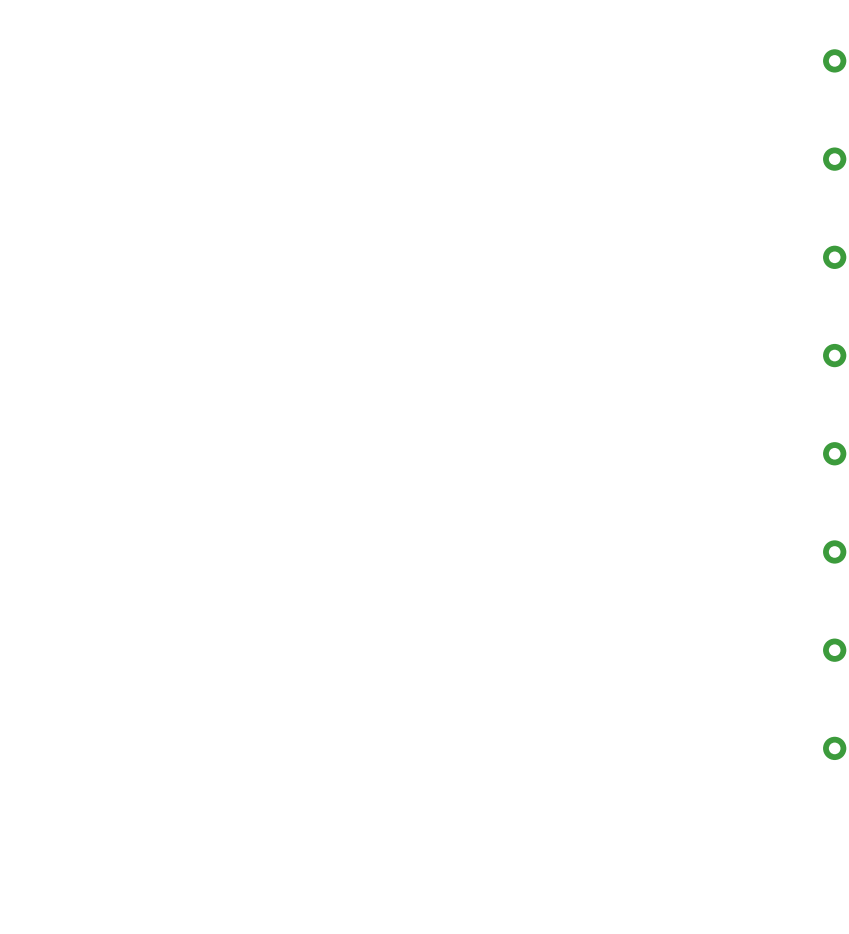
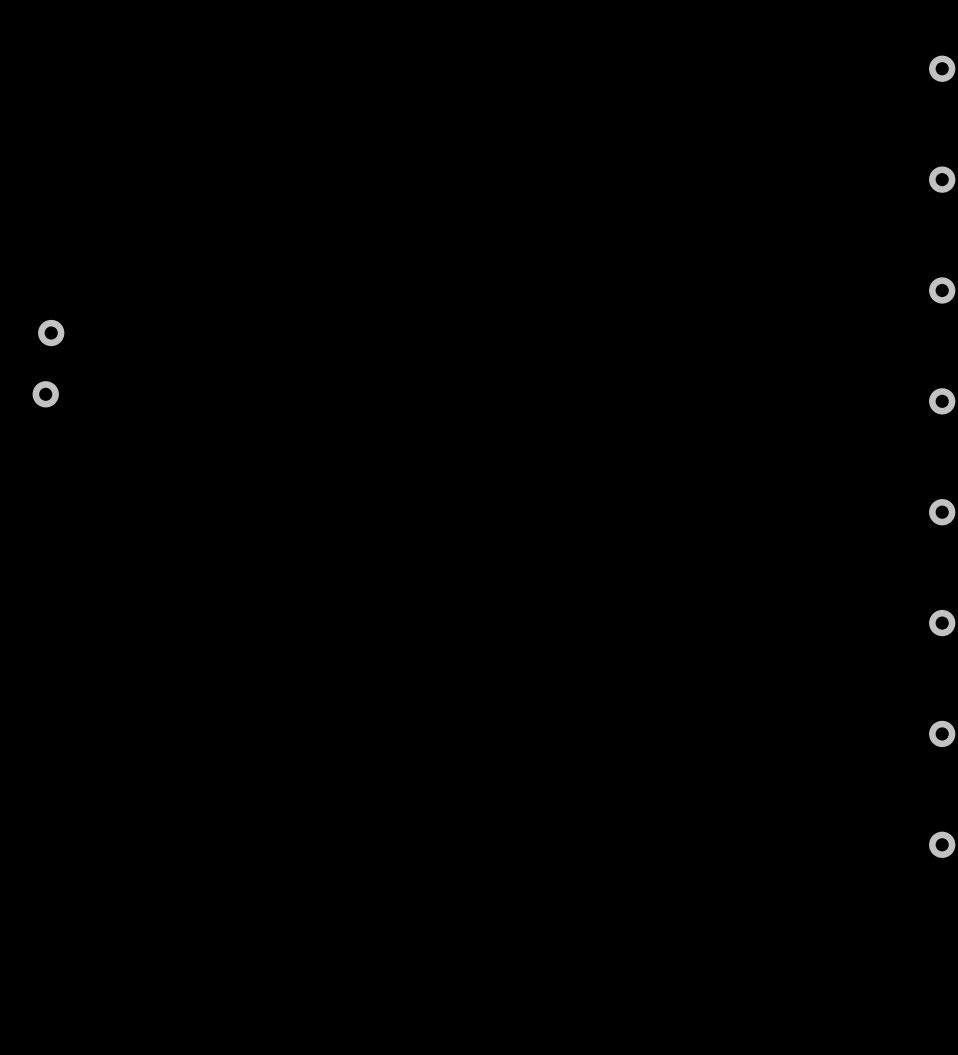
via: none -> (51, 333)
via: none -> (45, 394)

